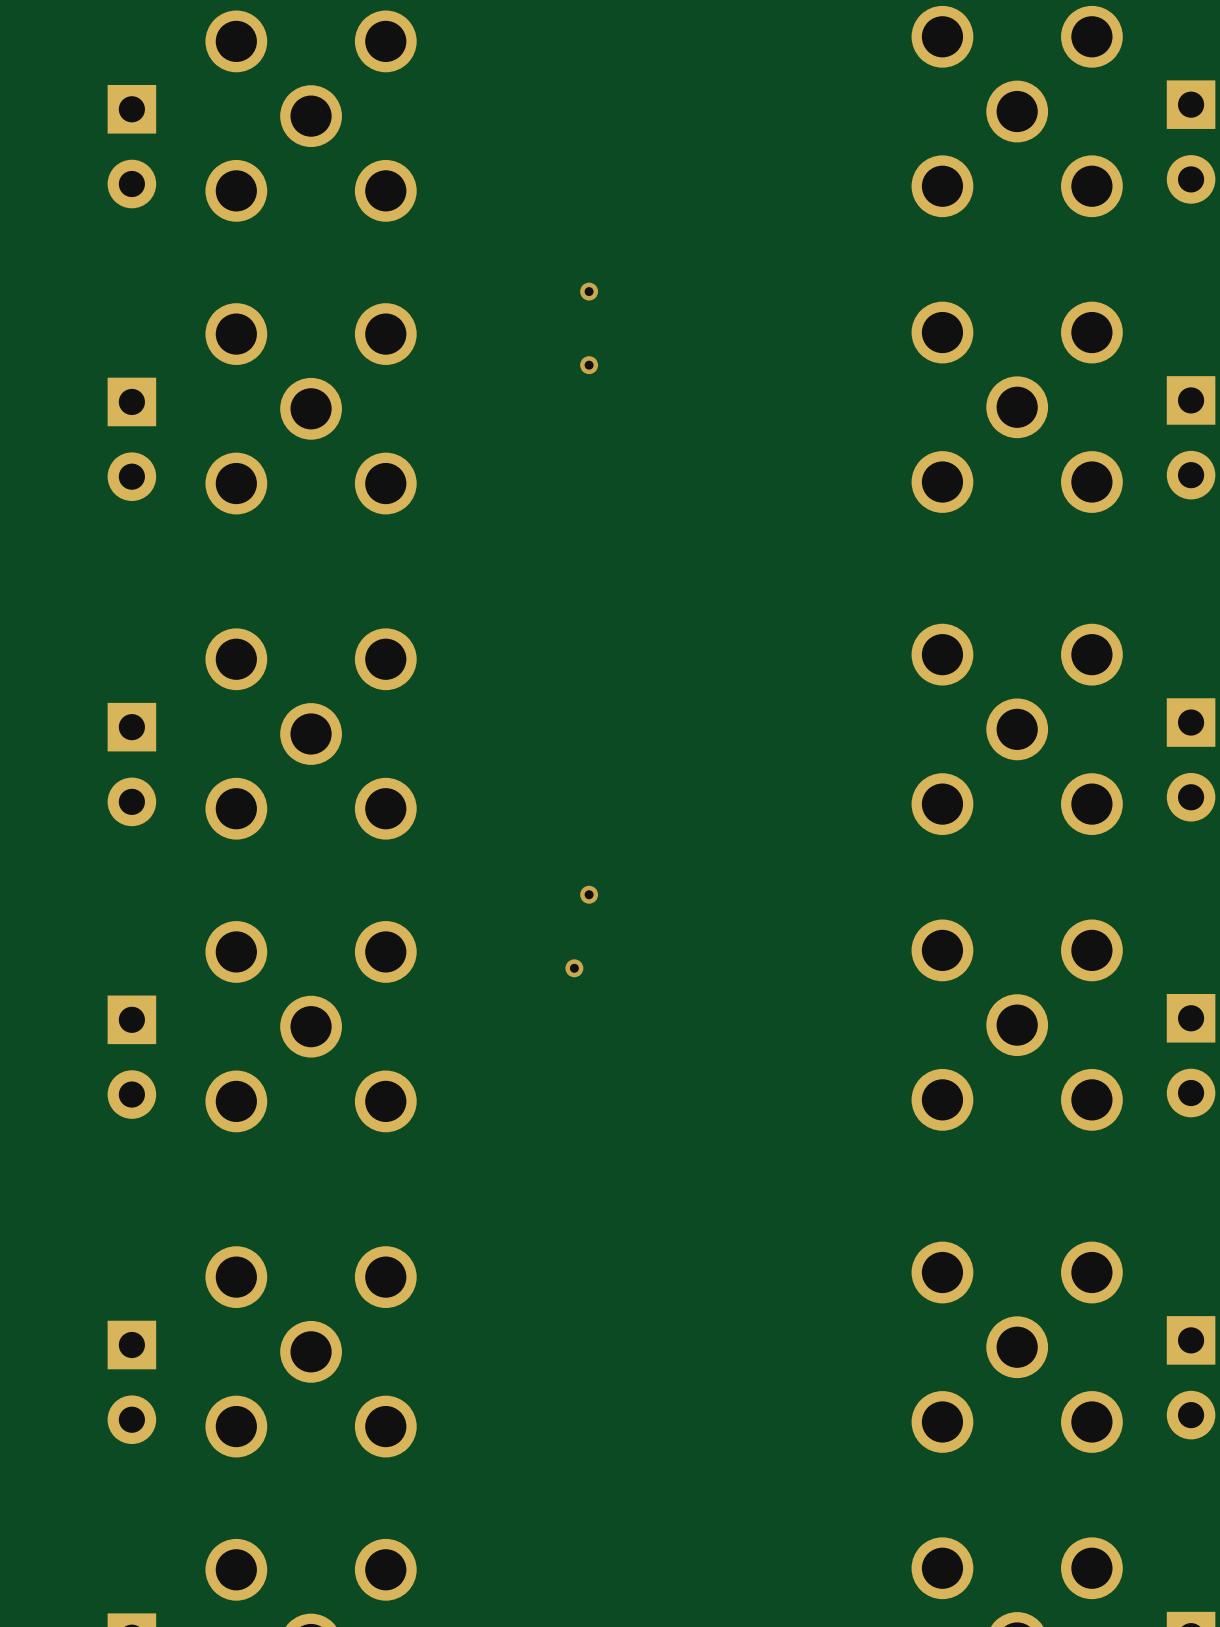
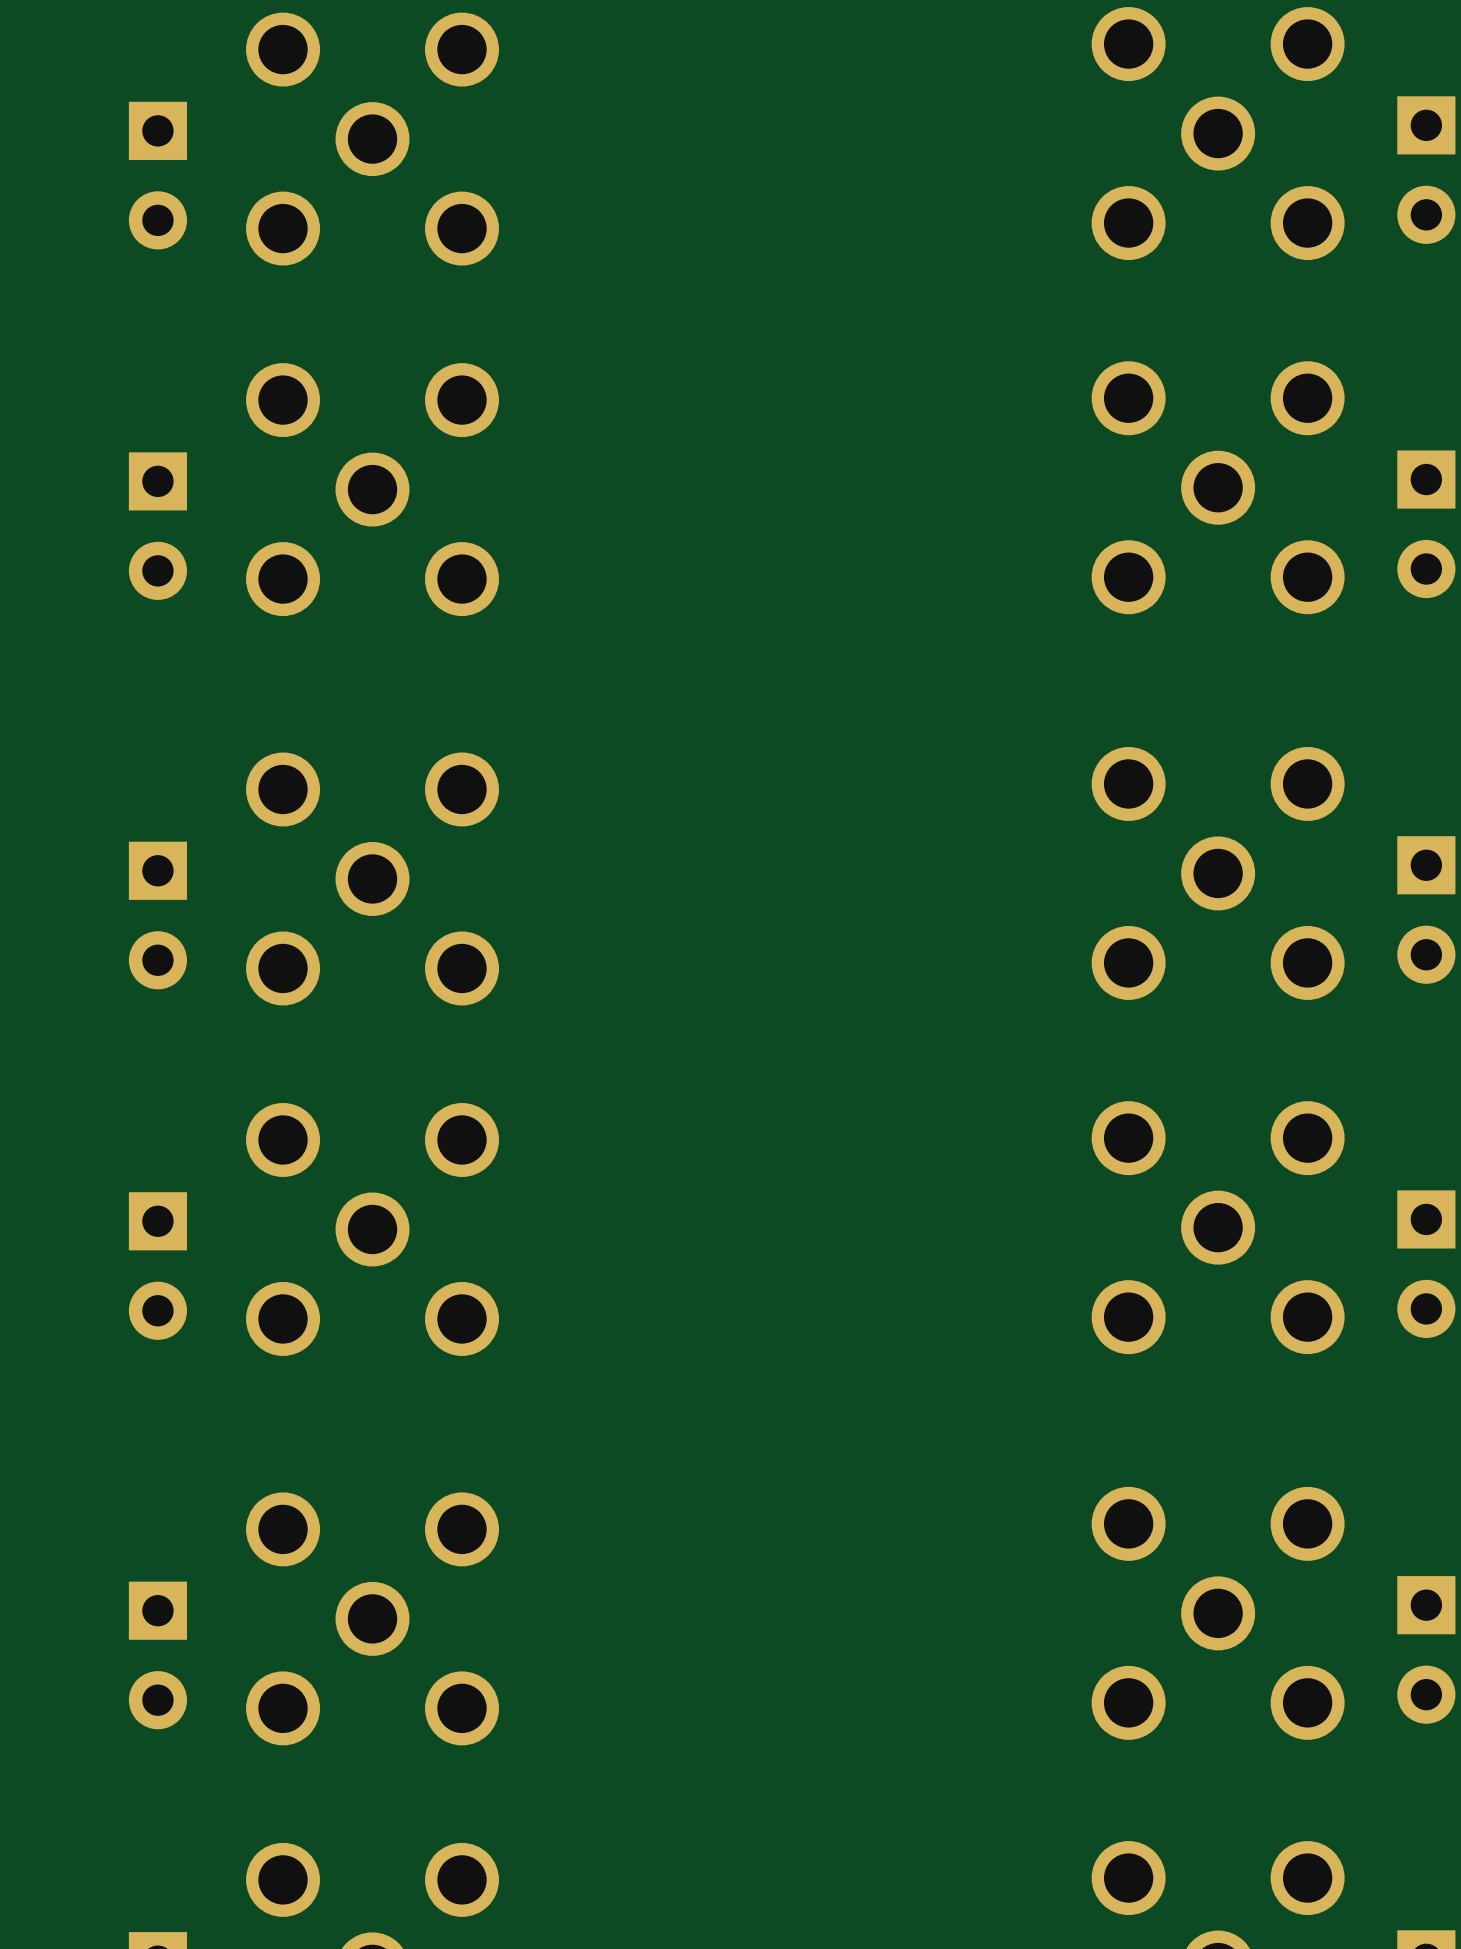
via: (589, 291) -> none
via: (589, 365) -> none
via: (589, 894) -> none
via: (574, 968) -> none

